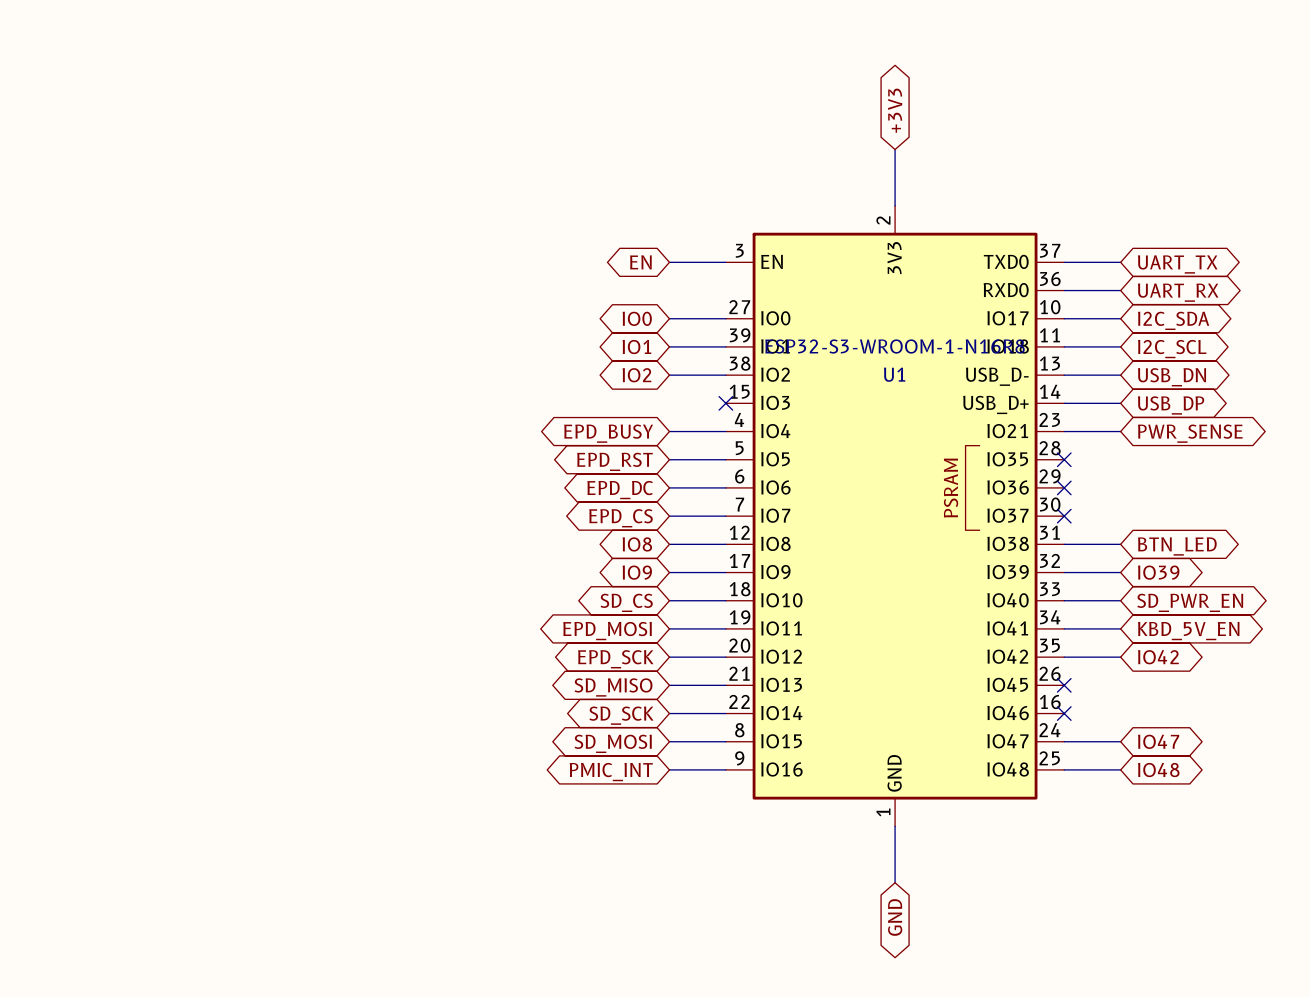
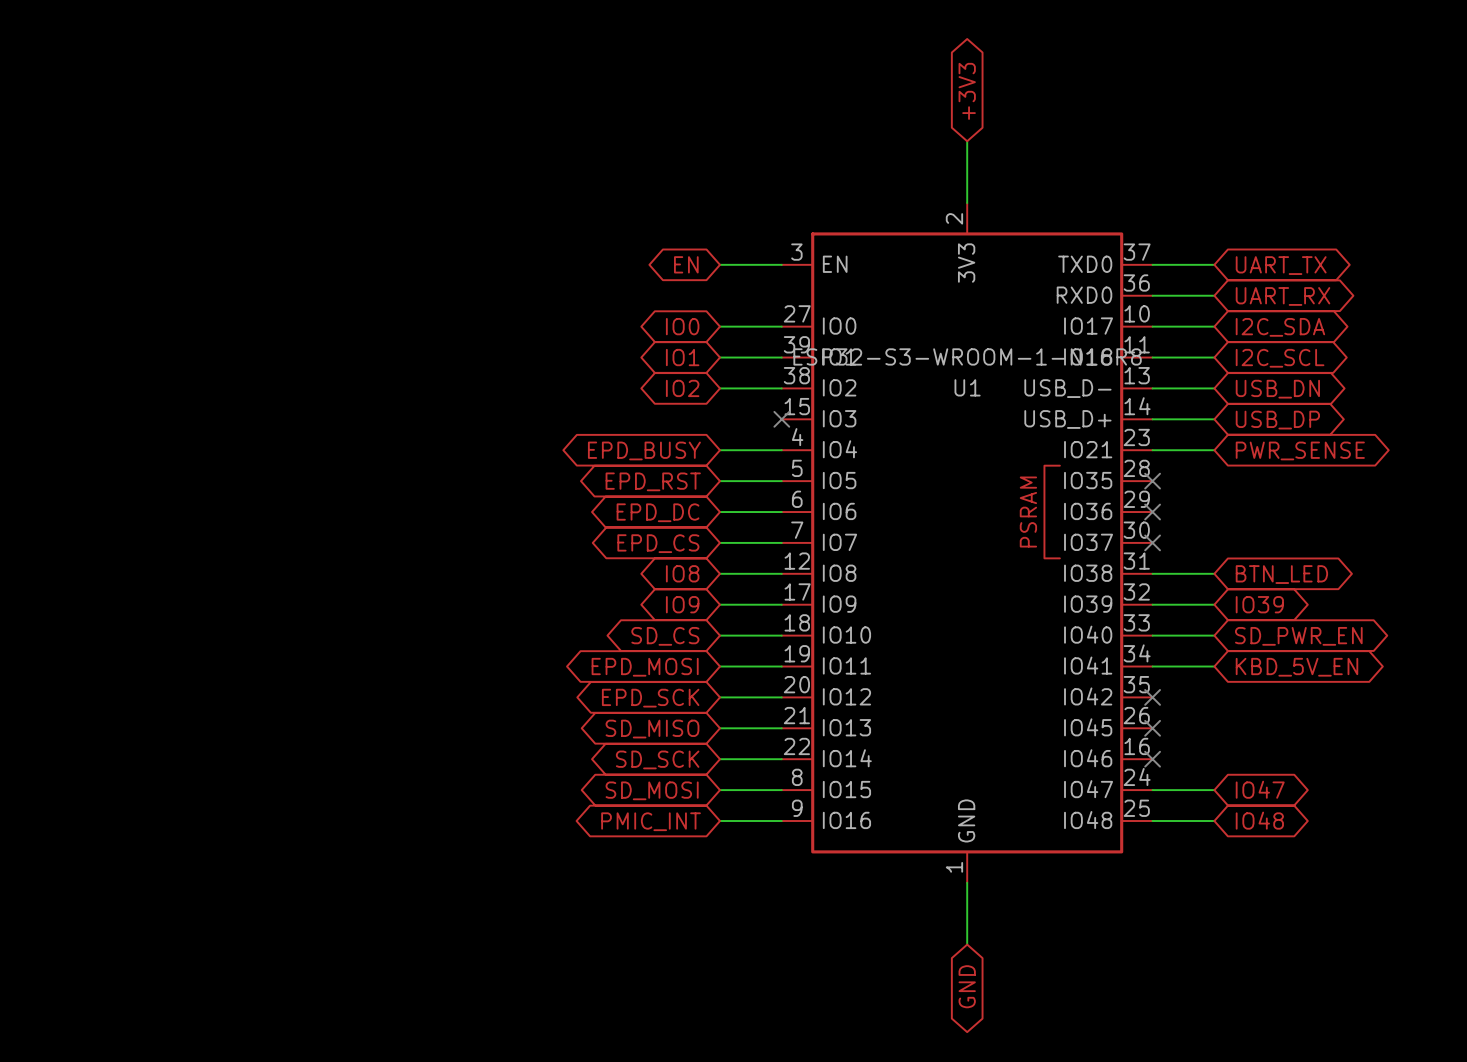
wire: (1064, 657) (1120, 657) -> none
no-connect mark: none -> (1152, 697)
global label: IO42 (1158, 657) -> none

